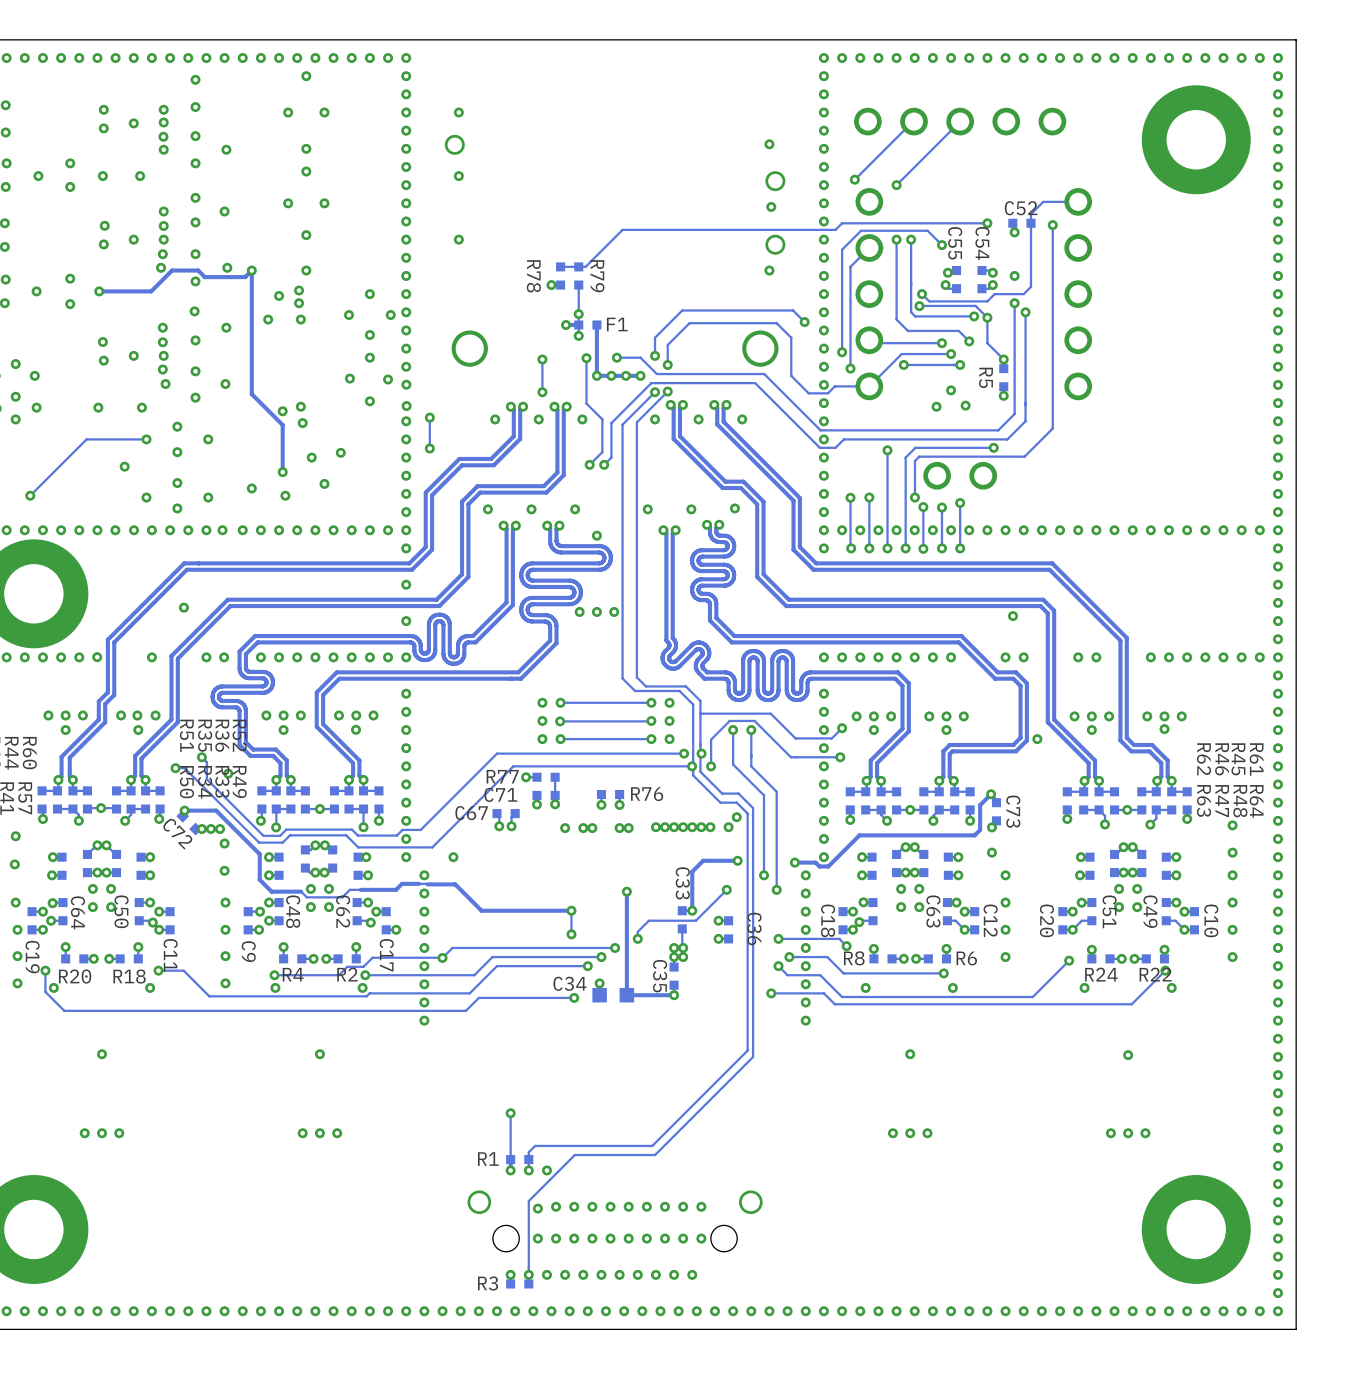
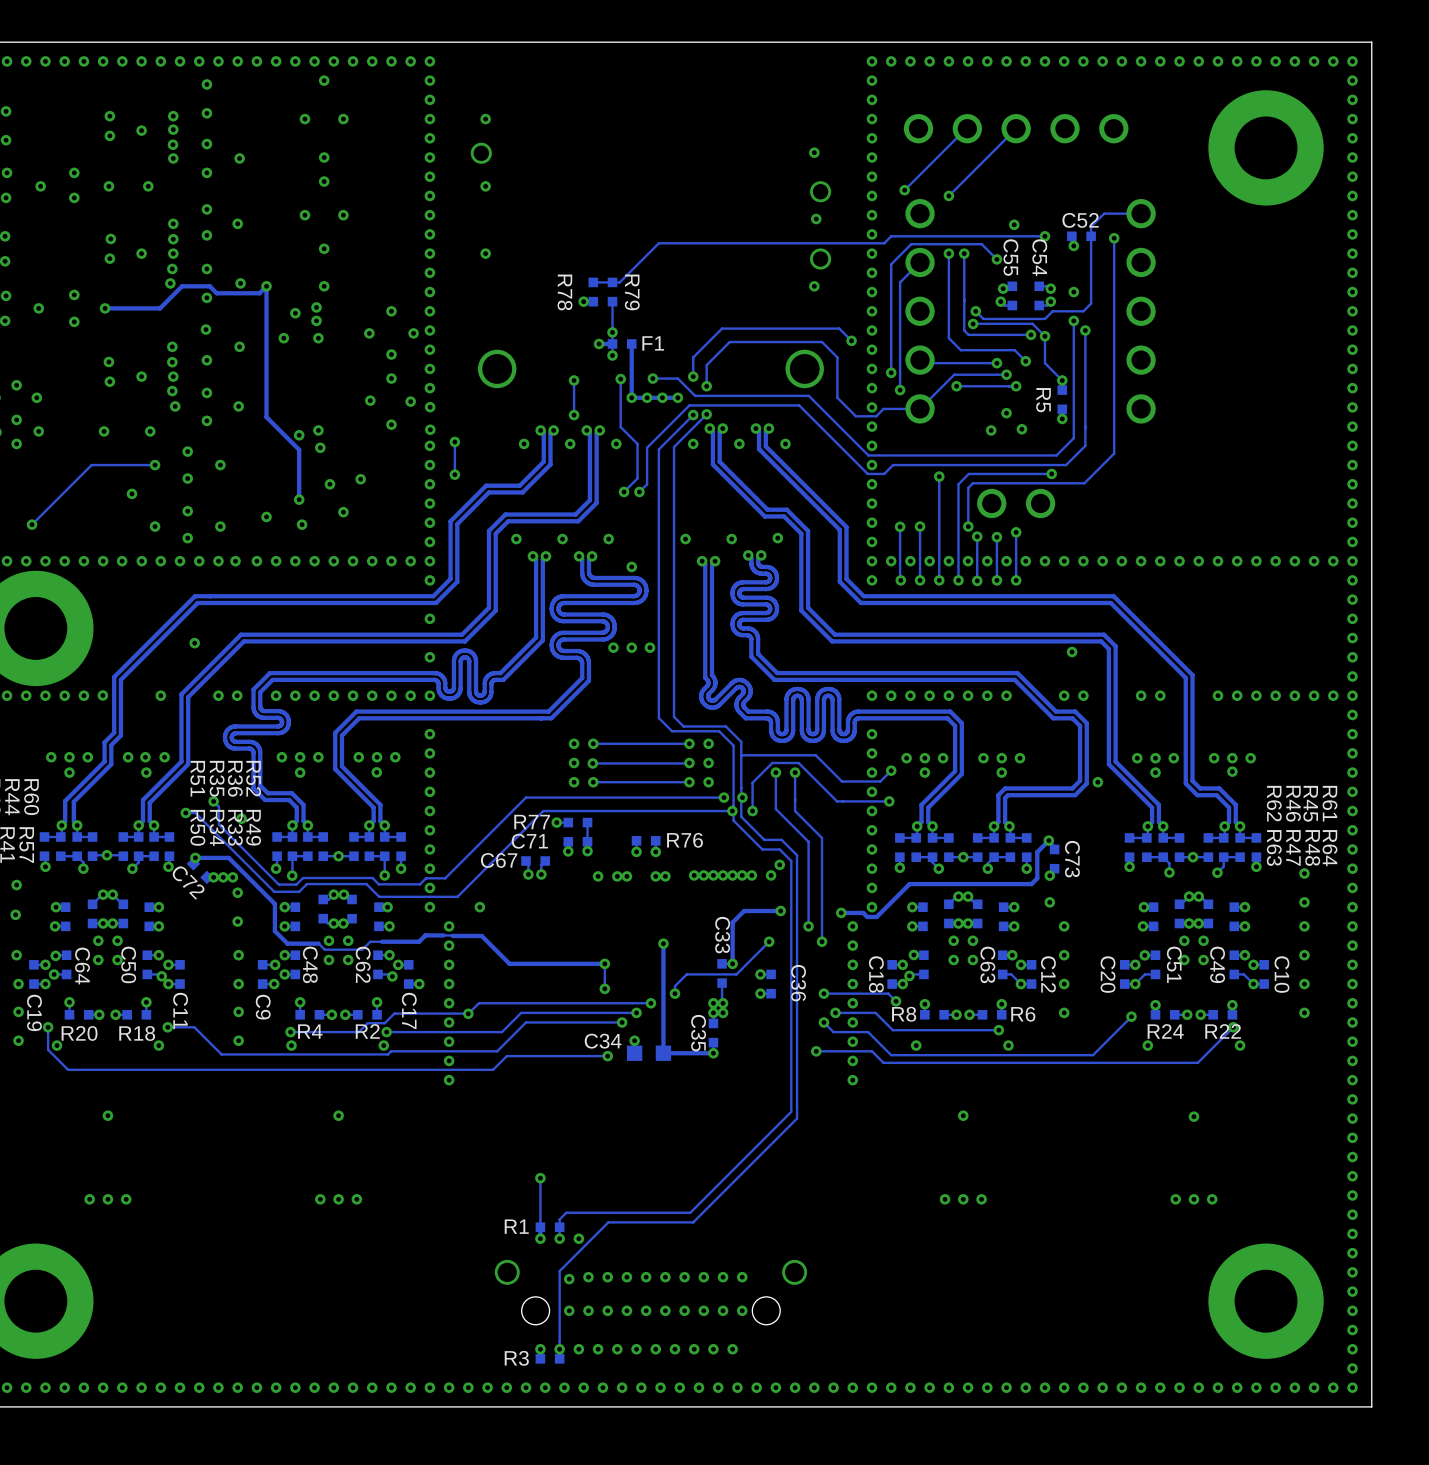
via: none -> (1014, 224)

